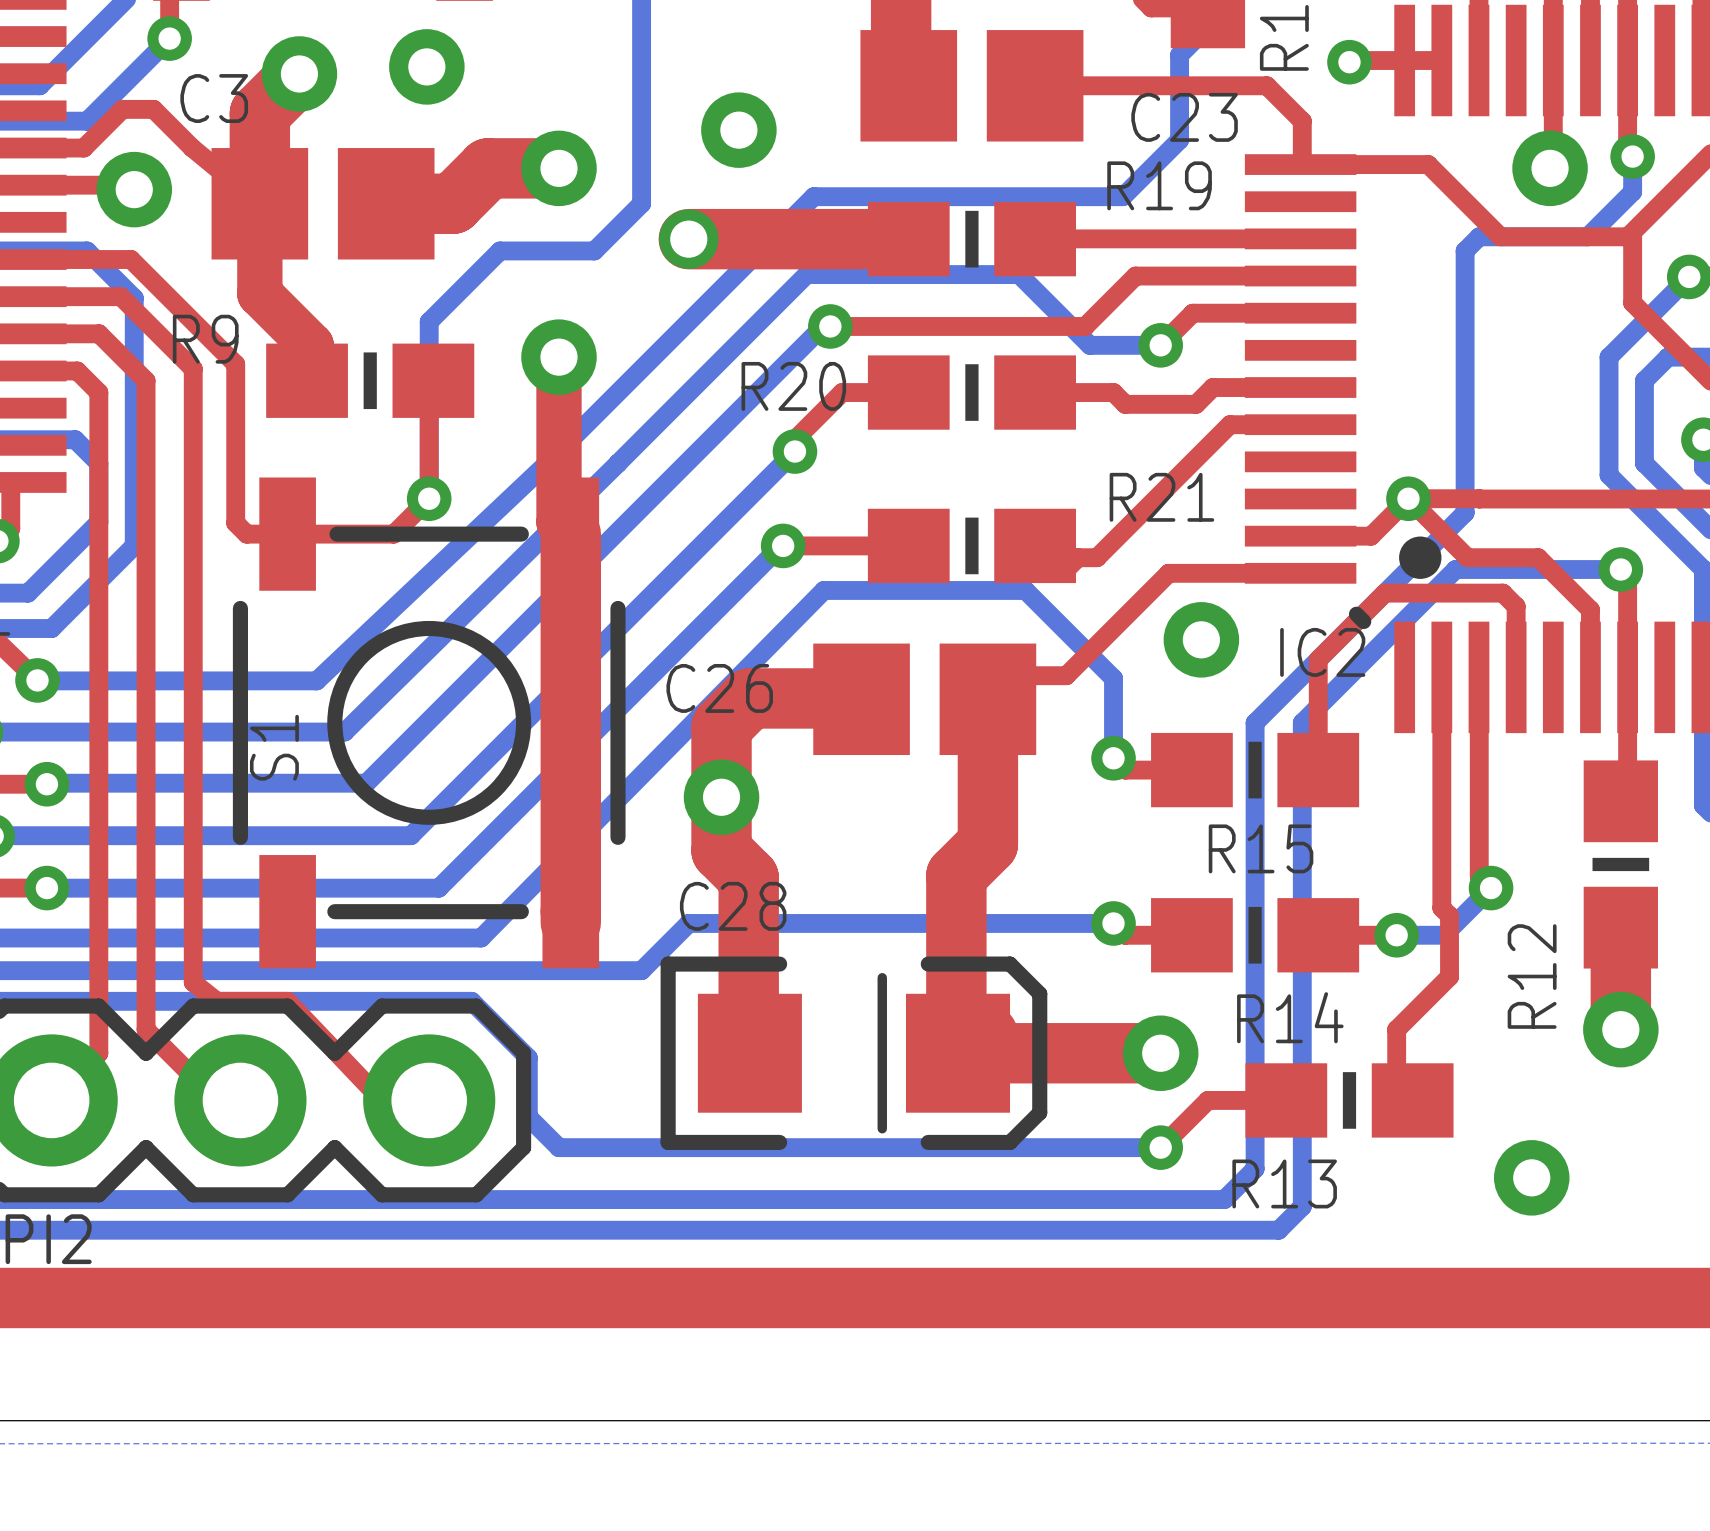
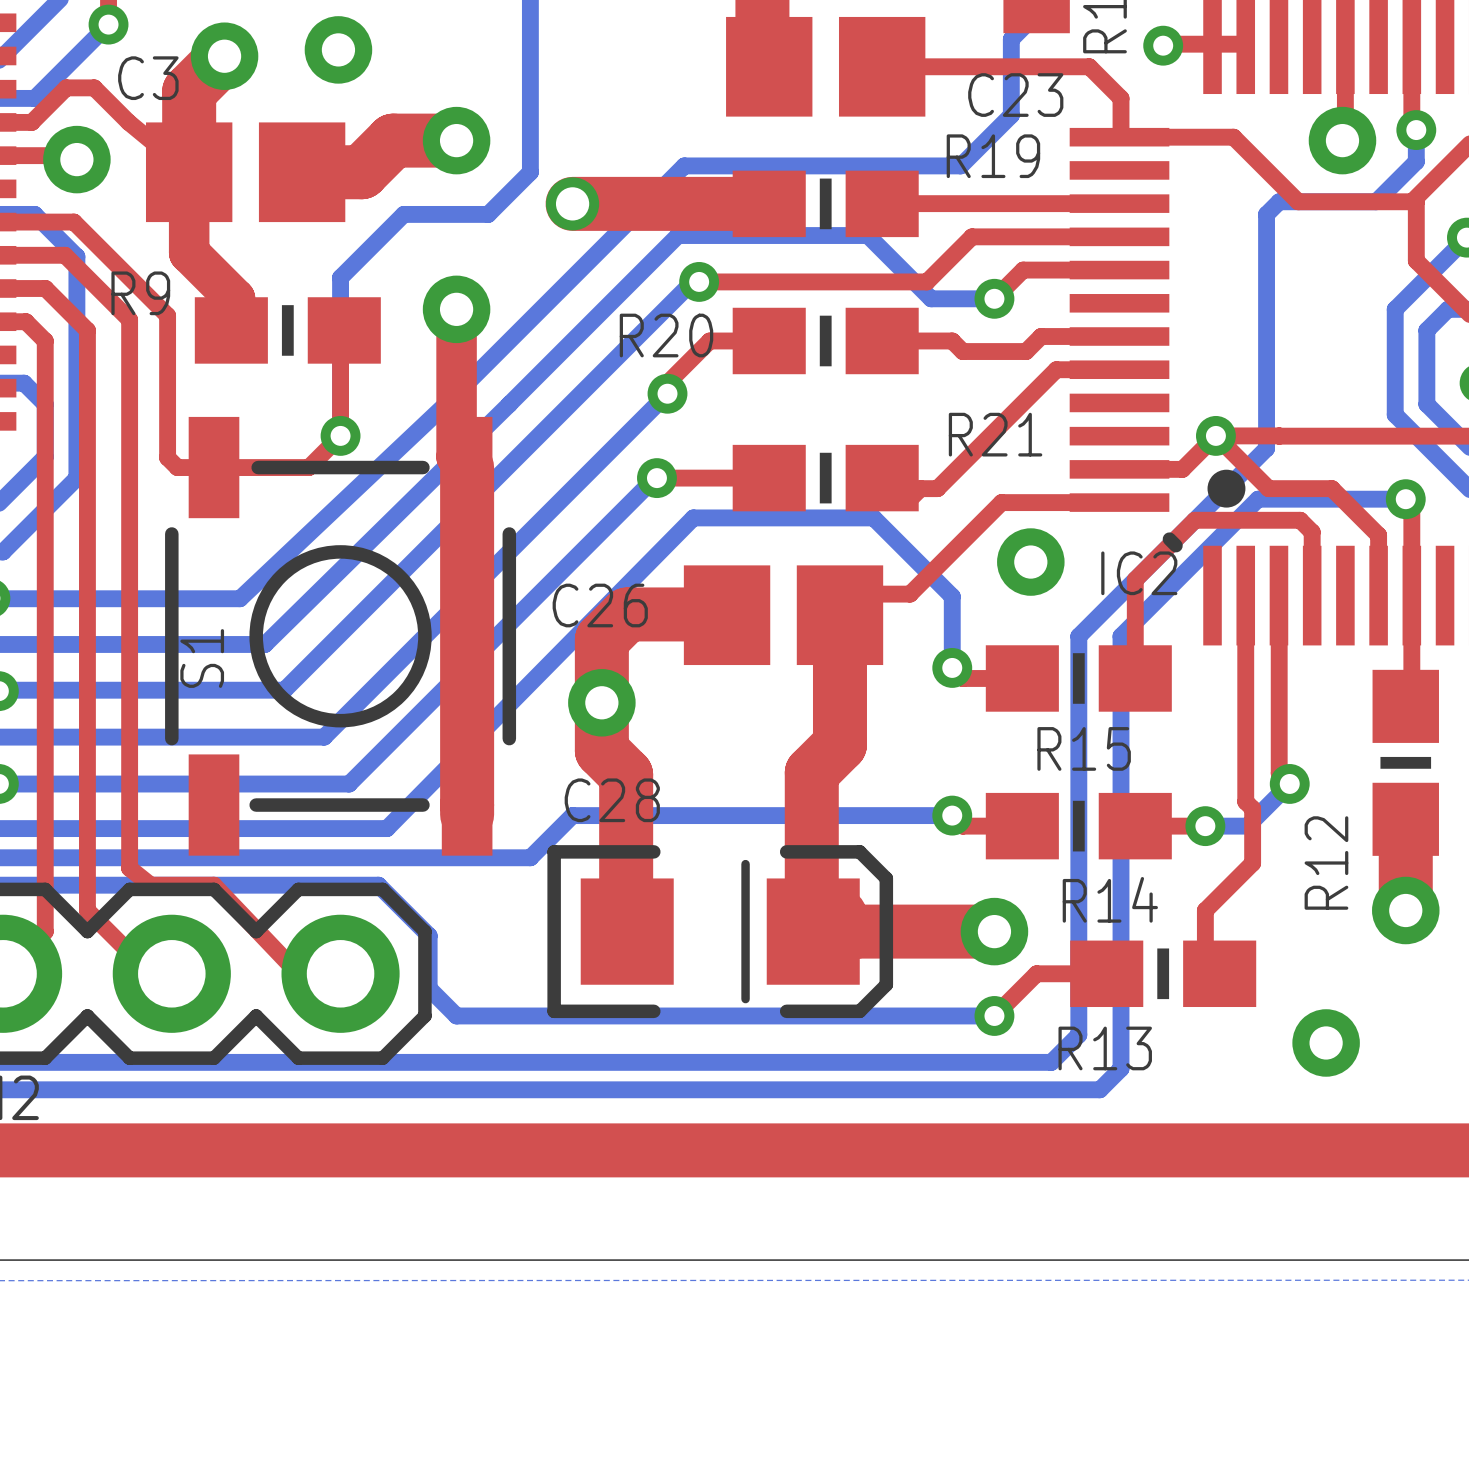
via: (738, 130) -> none

